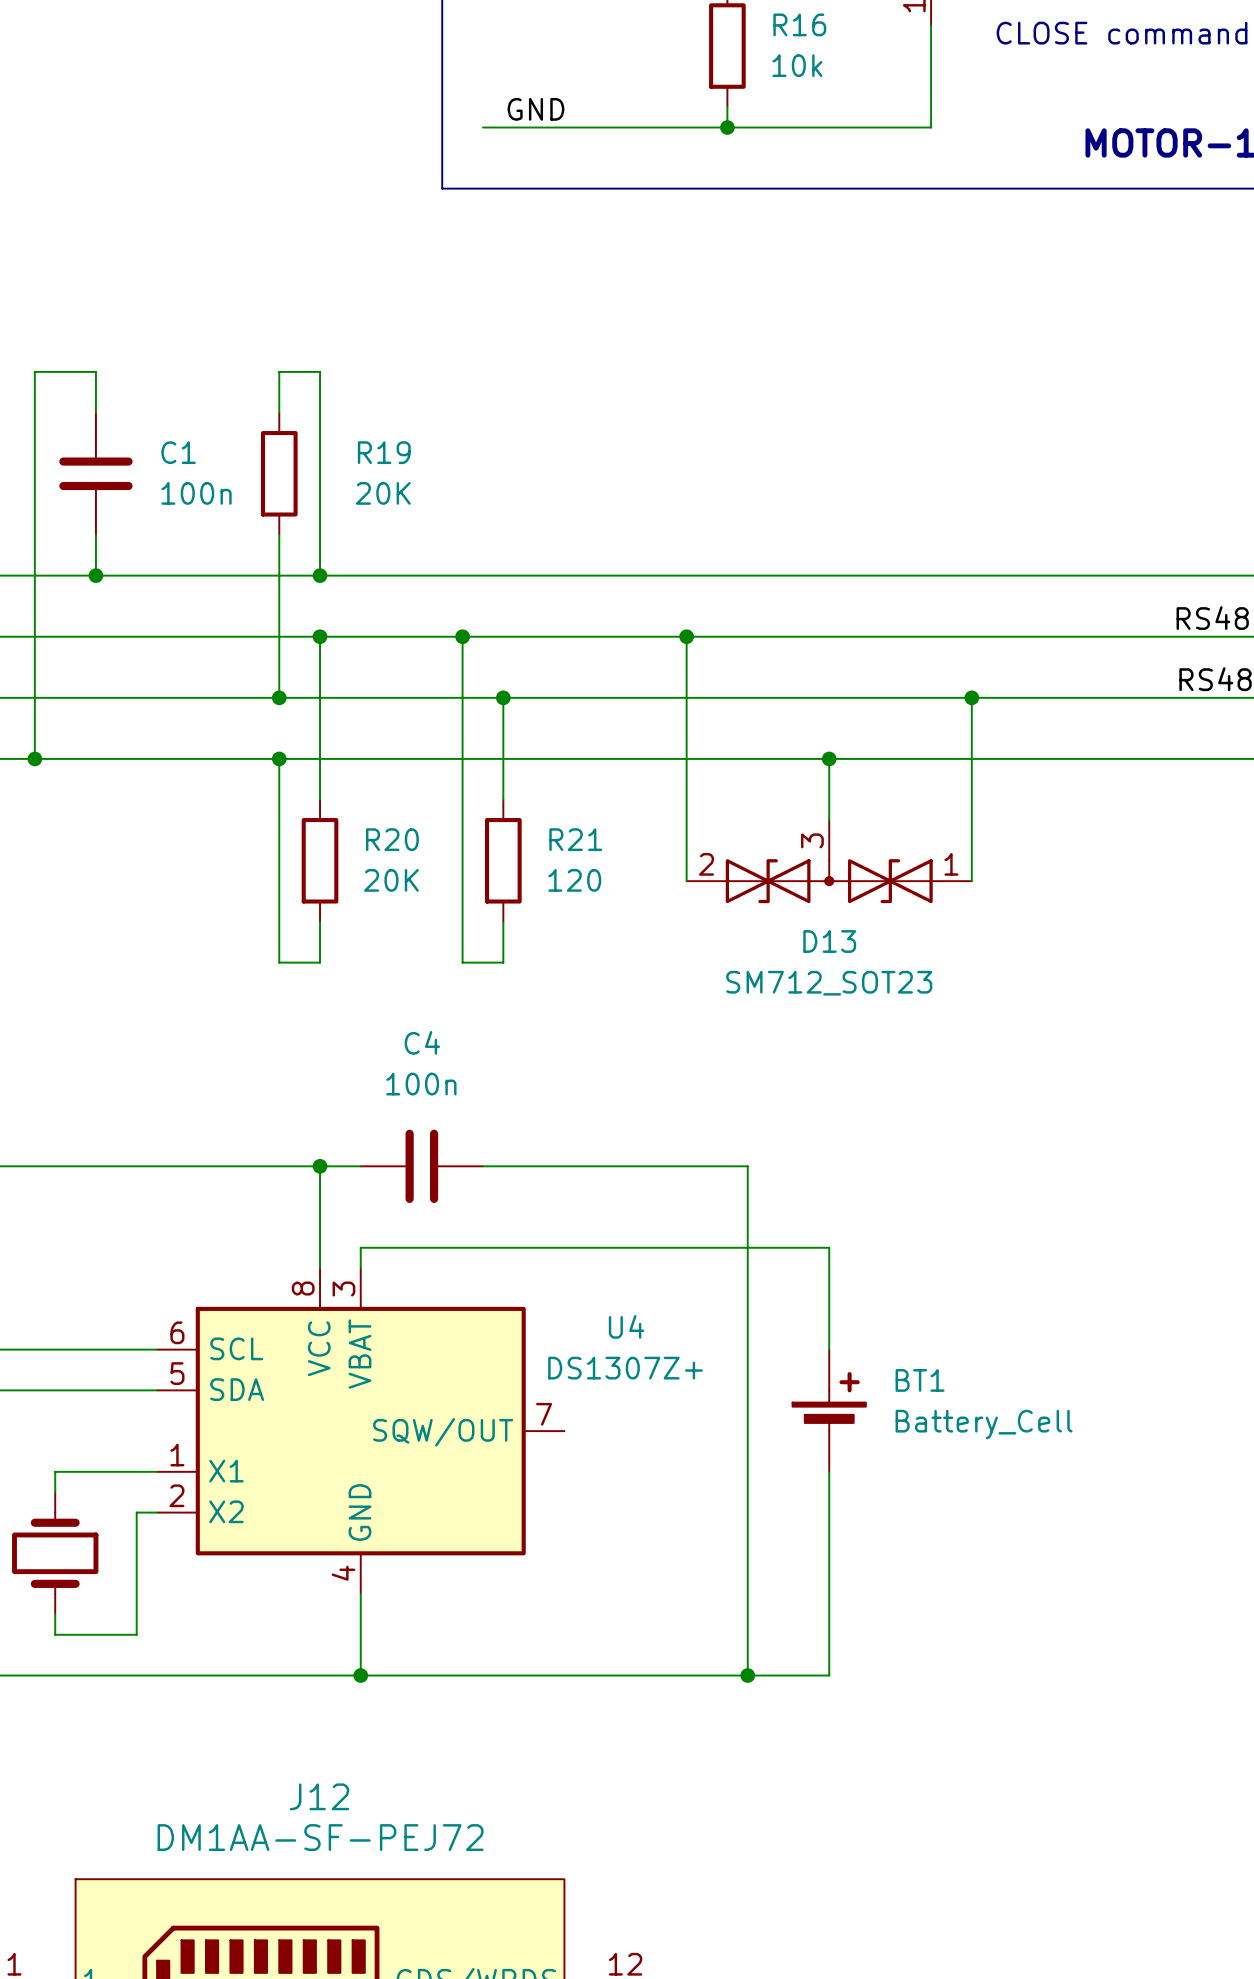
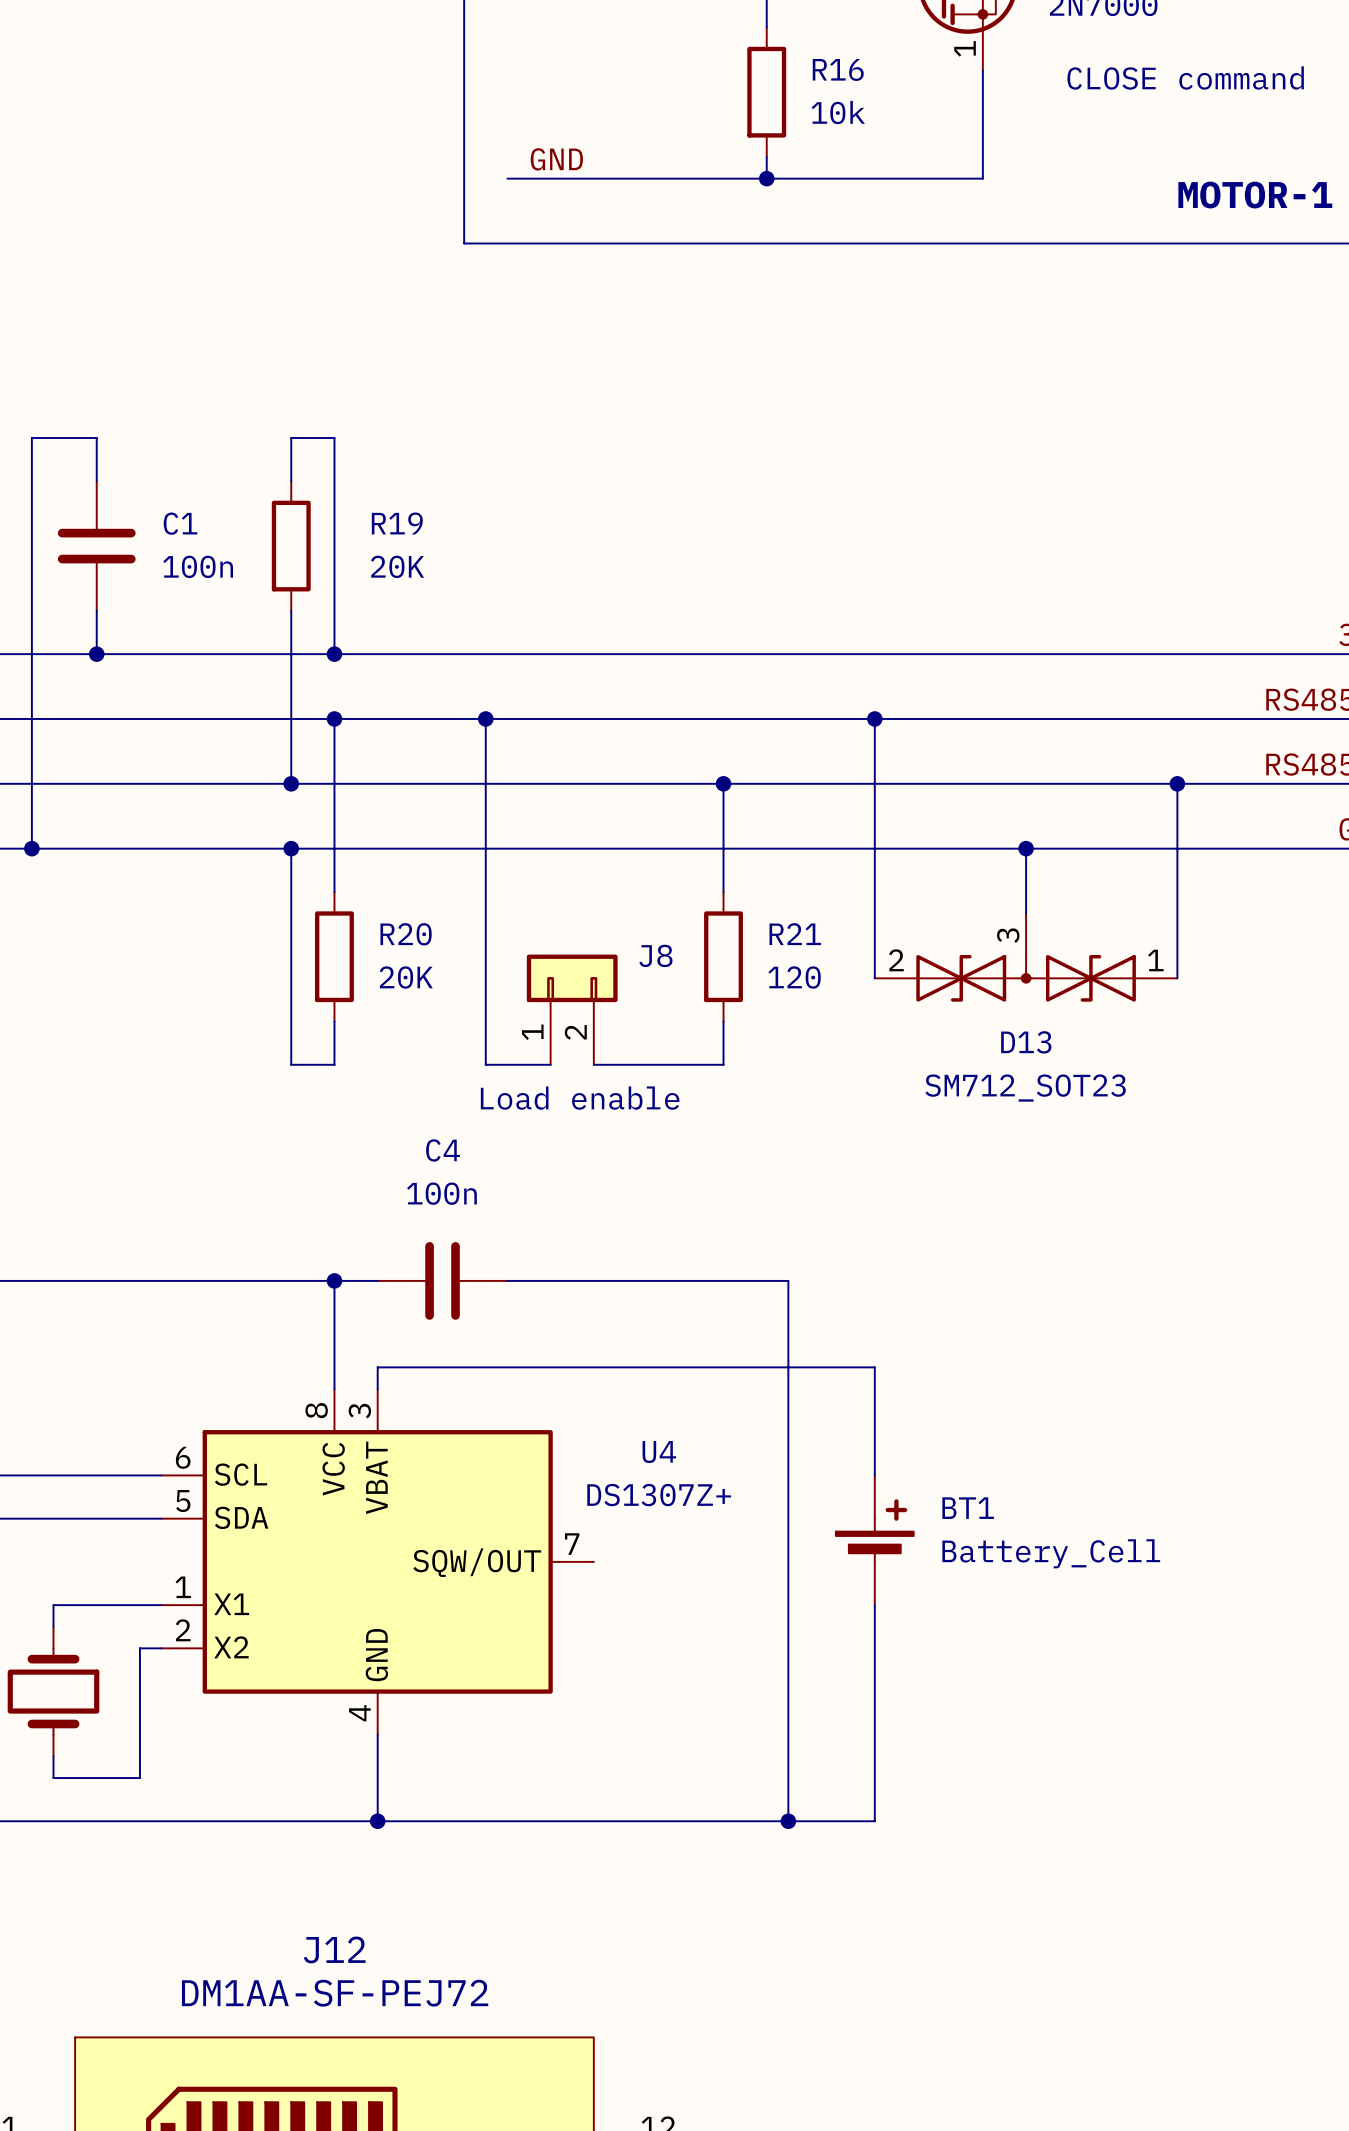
wire: (686, 636) (686, 697) -> none
junction position: (686, 636) -> (723, 783)
wire: none -> (874, 718) (874, 848)
junction: none -> (874, 718)
wire: (503, 697) (503, 799) -> none
junction: (503, 697) -> none
wire: (971, 697) (971, 758) -> none
junction position: (971, 697) -> (1026, 848)
wire: none -> (1177, 783) (1177, 978)
junction: none -> (1177, 783)
junction: (829, 758) -> none
wire: (686, 799) (686, 881) -> none
R21 position: (503, 860) -> (723, 956)
D13 position: (829, 861) -> (1026, 957)
J8: none -> Load enable (572, 1009)
wire: (503, 921) (503, 962) -> (550, 1064) (528, 1064)
wire: none -> (723, 1021) (723, 1064) (593, 1064)

